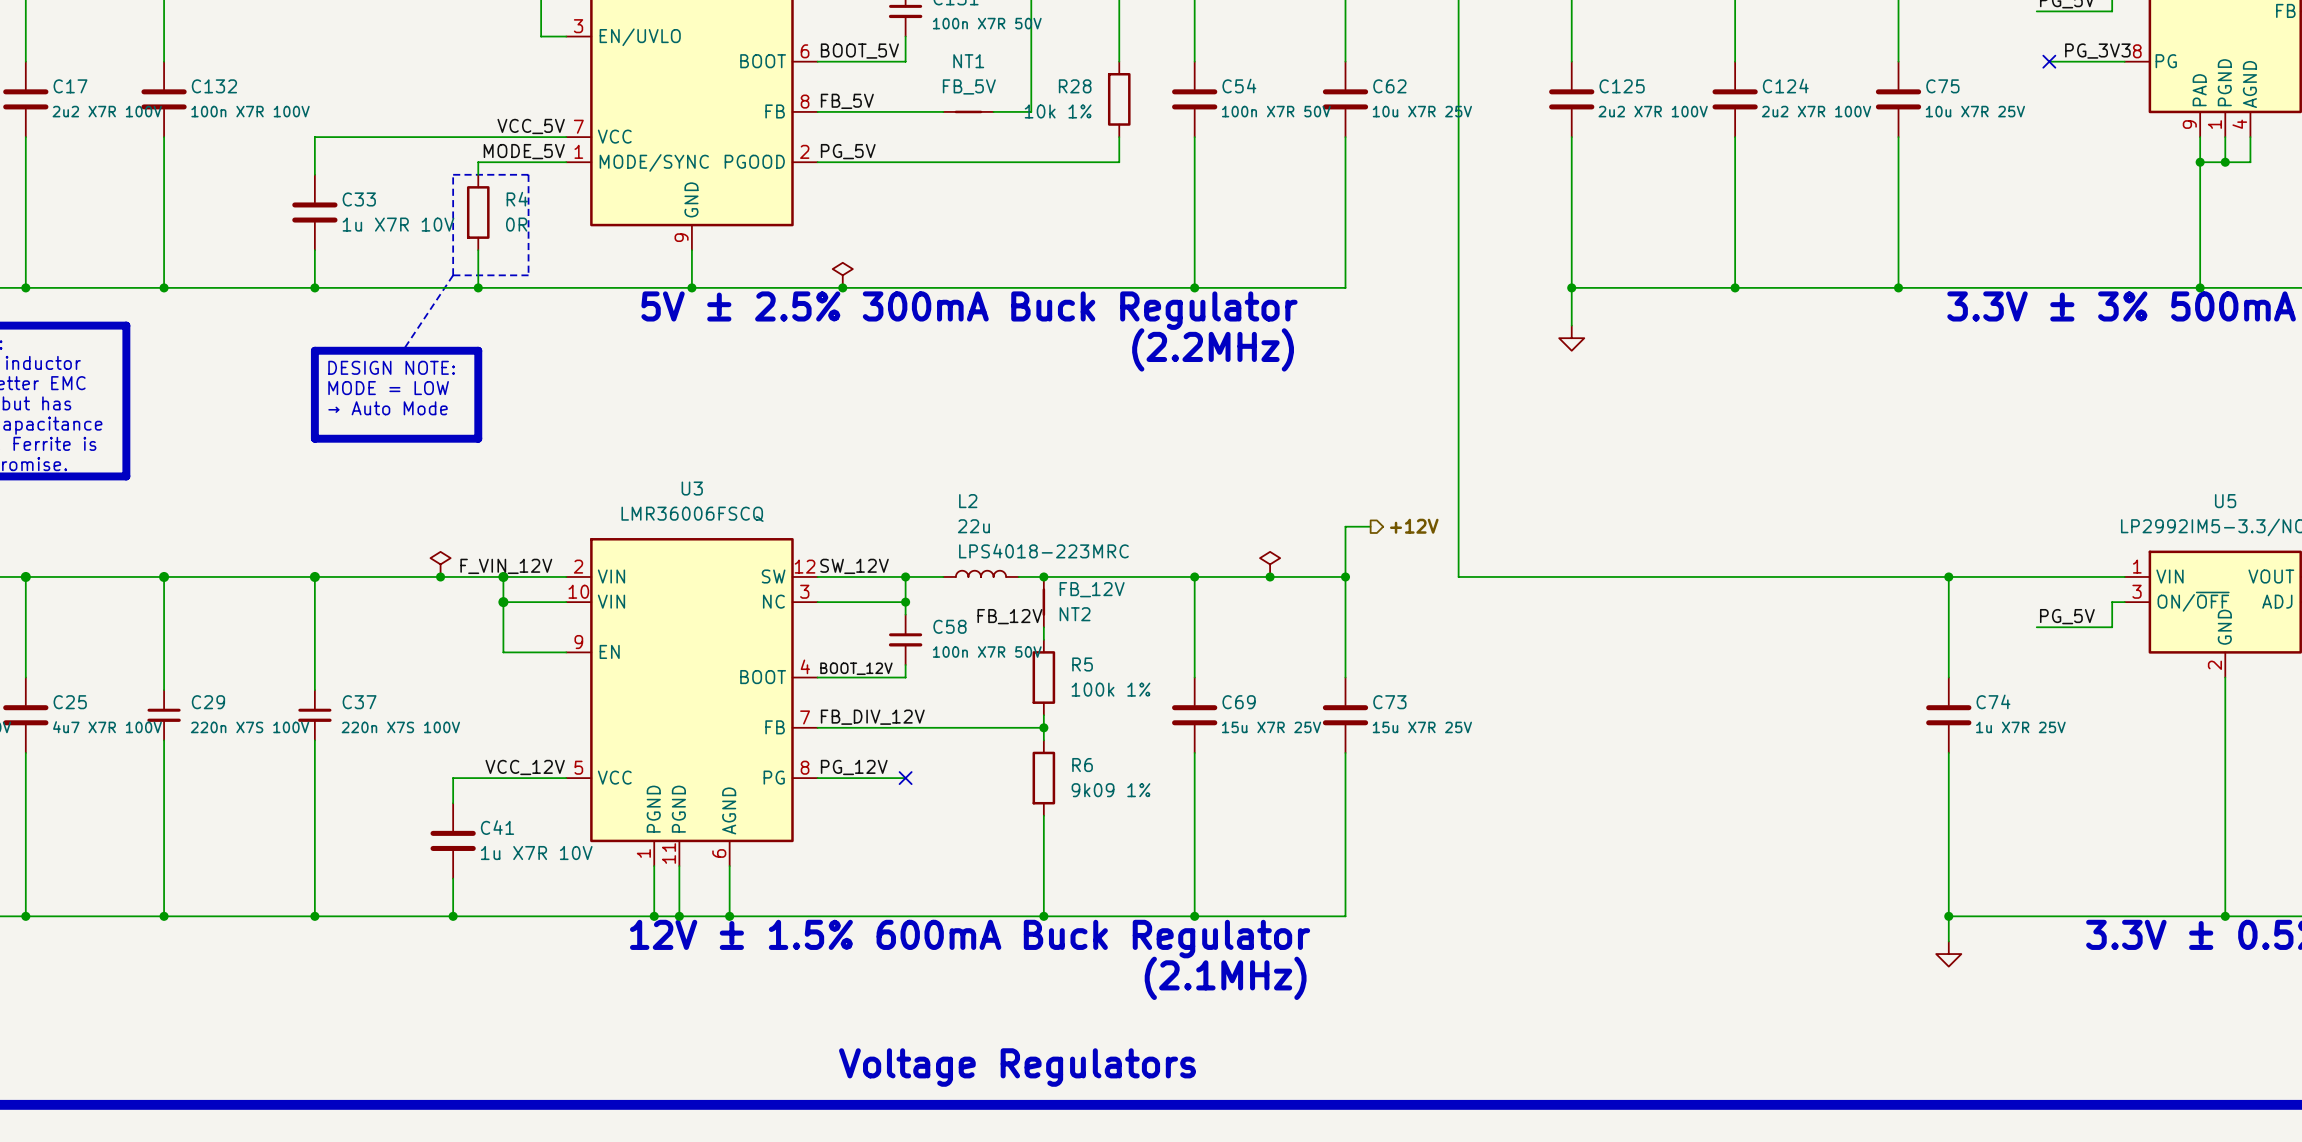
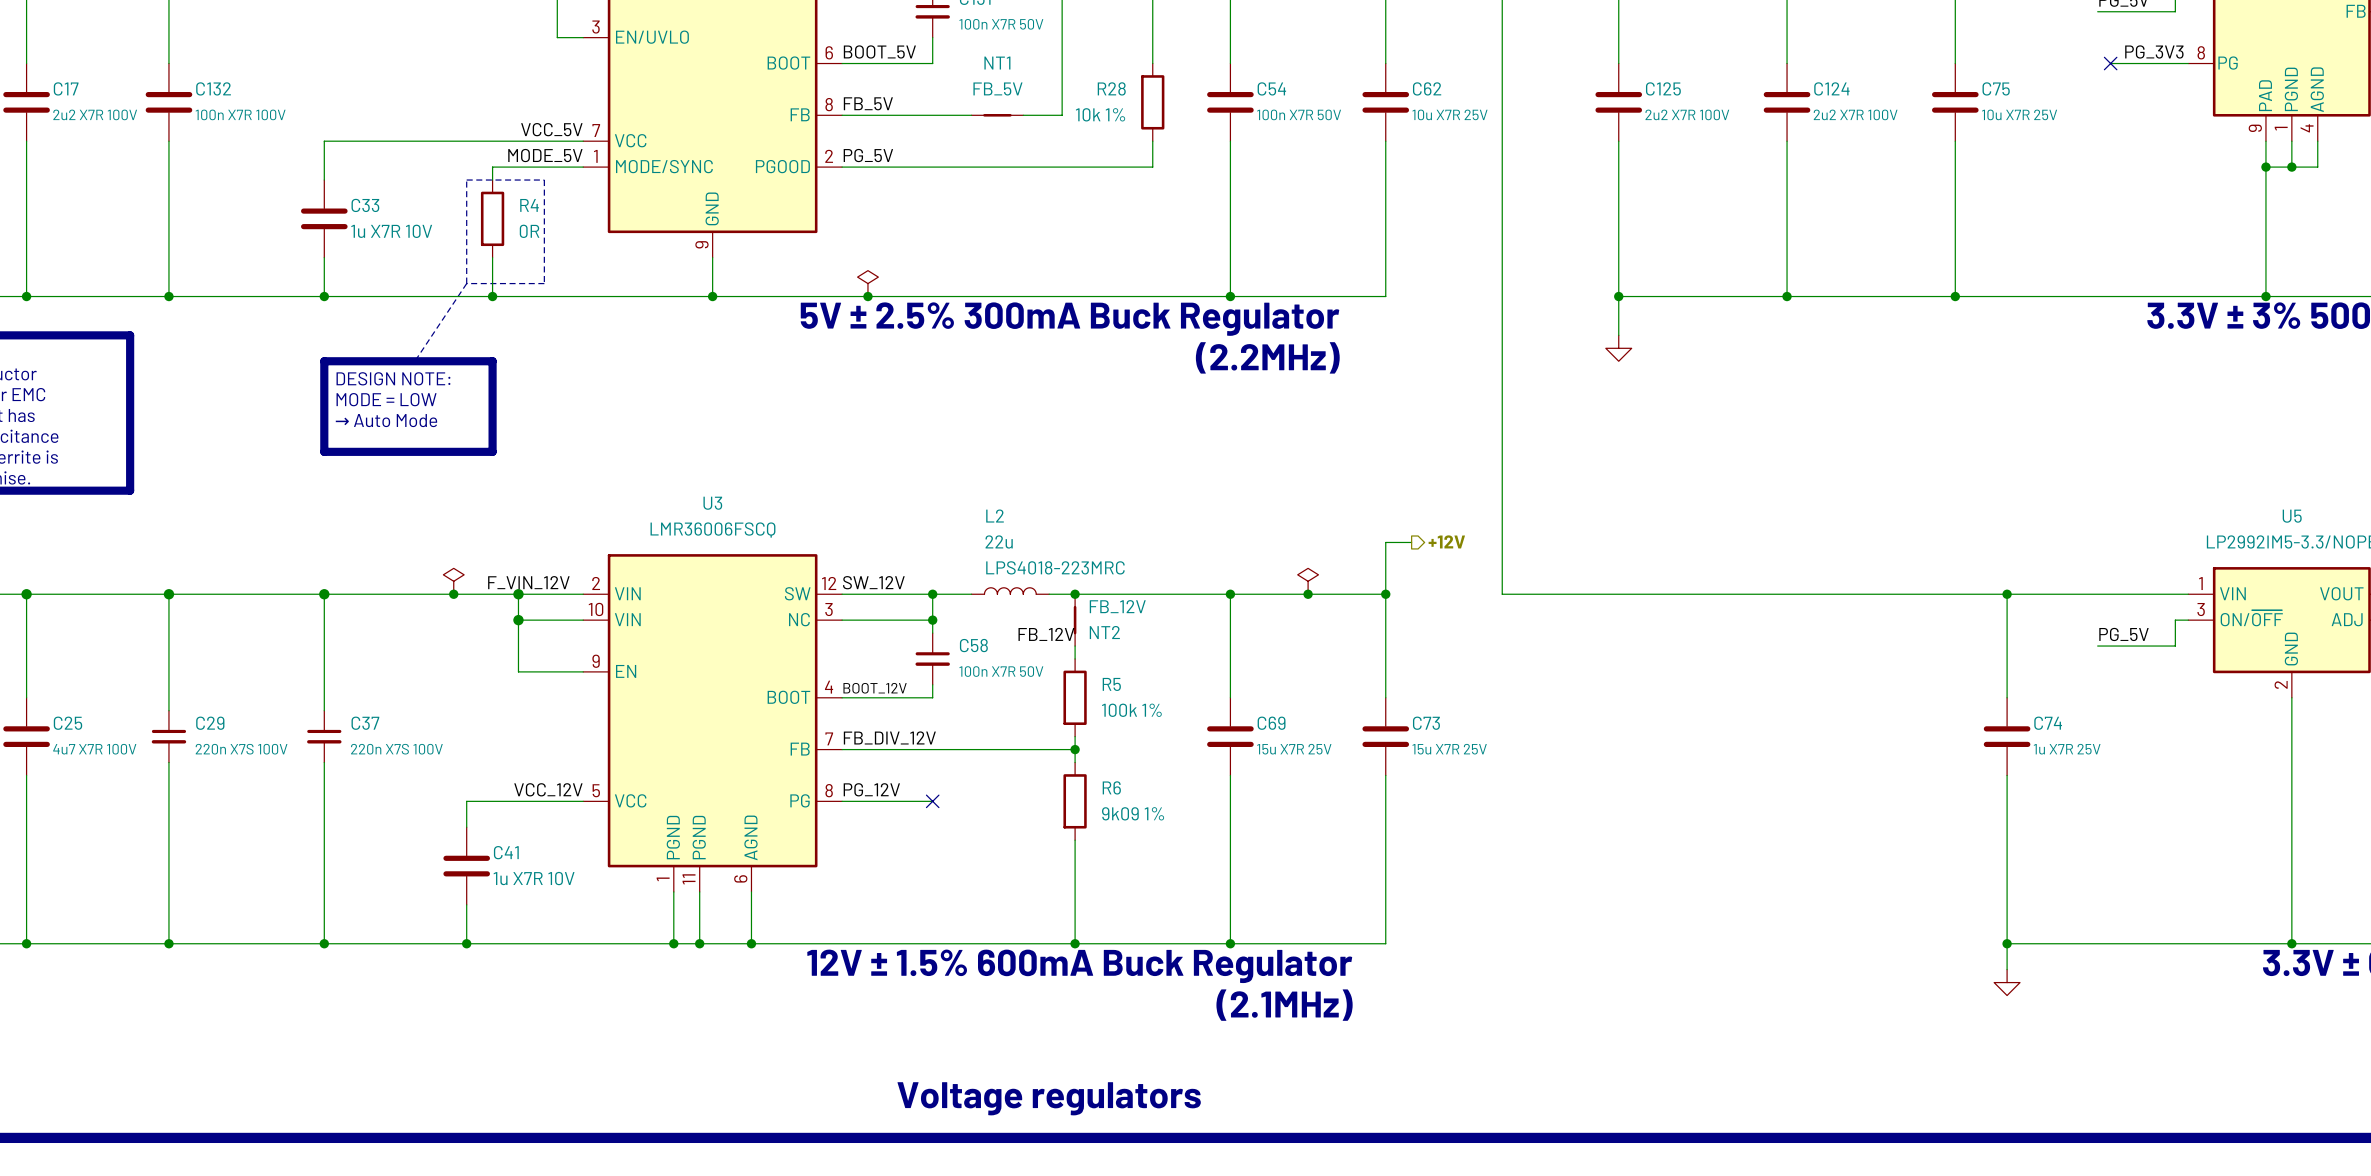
text: Voltage Regulators (1017, 1067) -> Voltage regulators (1049, 1098)

